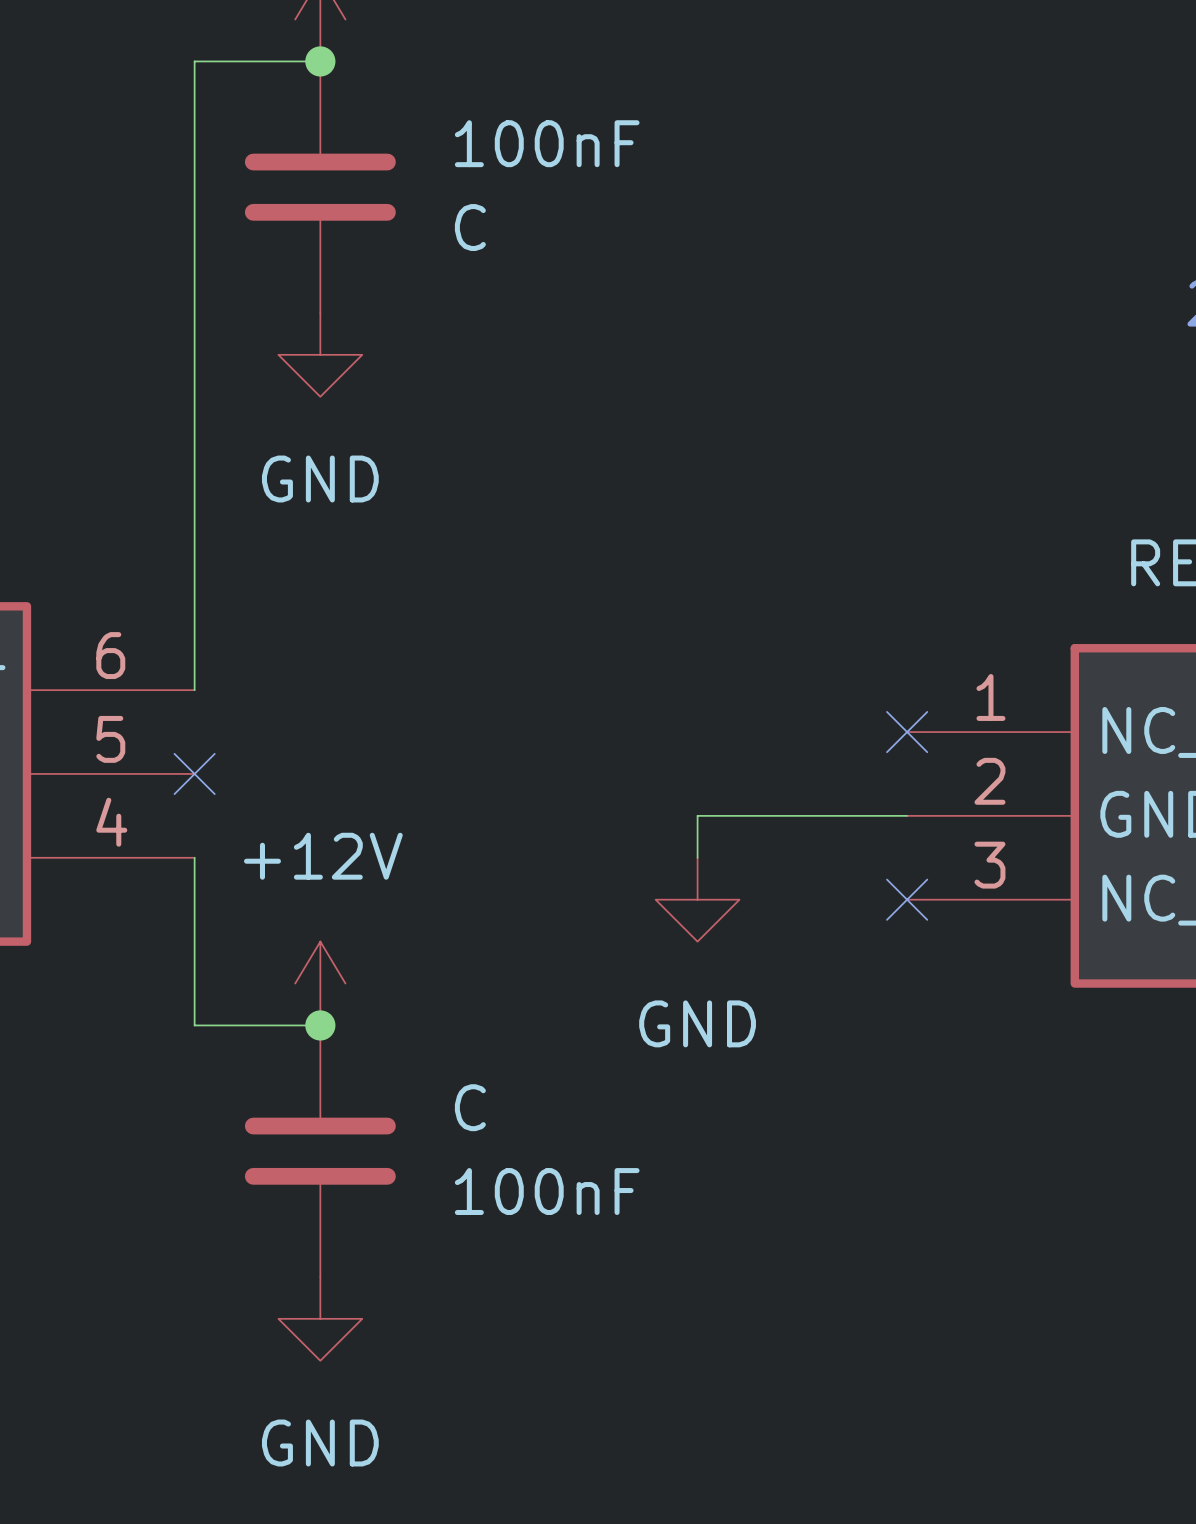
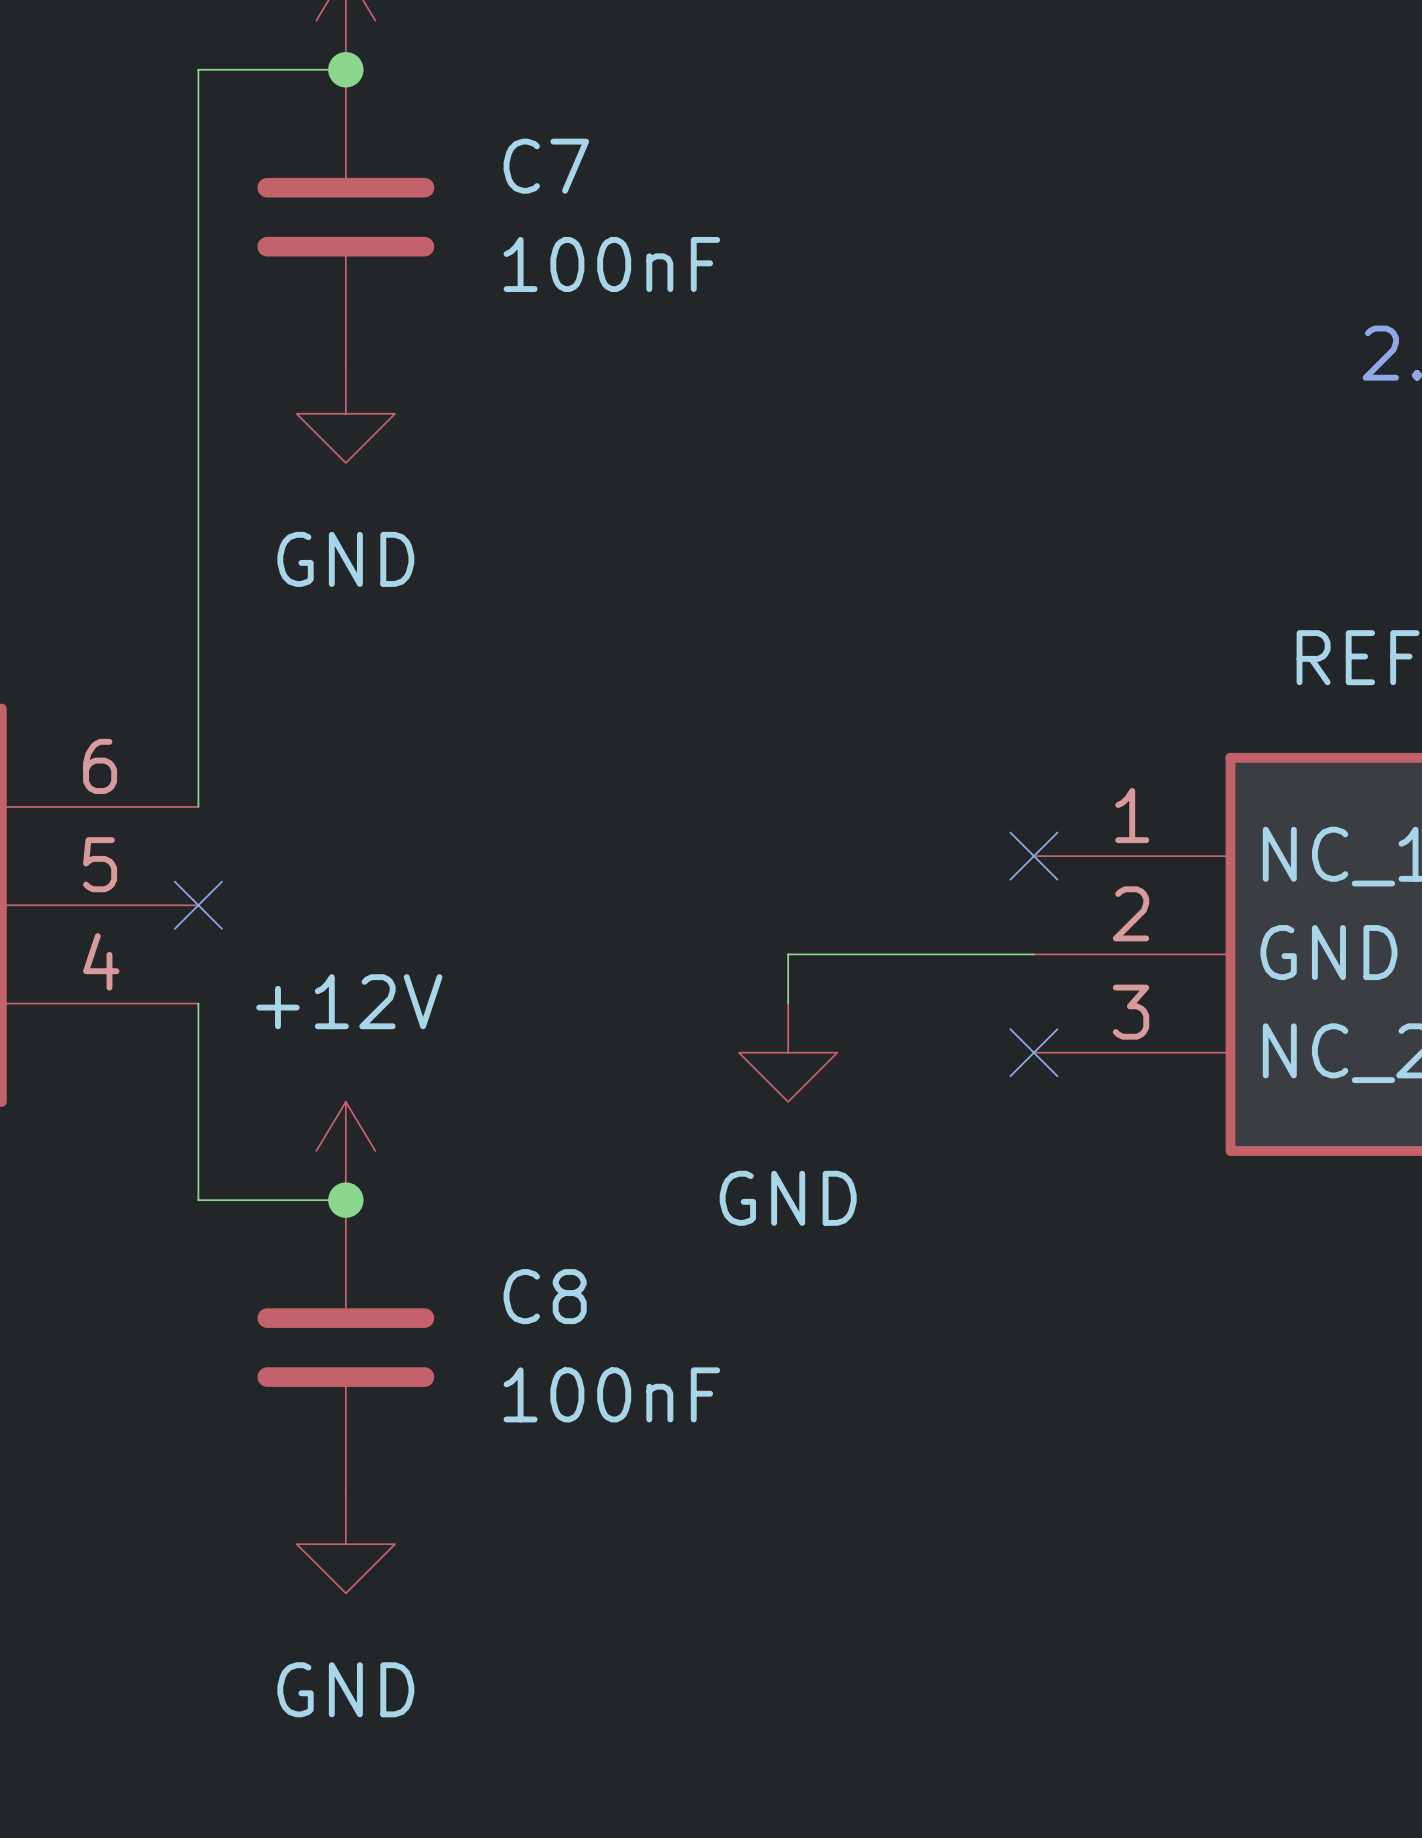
100nF name: 100nF (547, 143) -> C7 (546, 166)
100nF value: C (470, 227) -> 100nF (611, 264)
C name: C (470, 1107) -> C8 (545, 1296)

